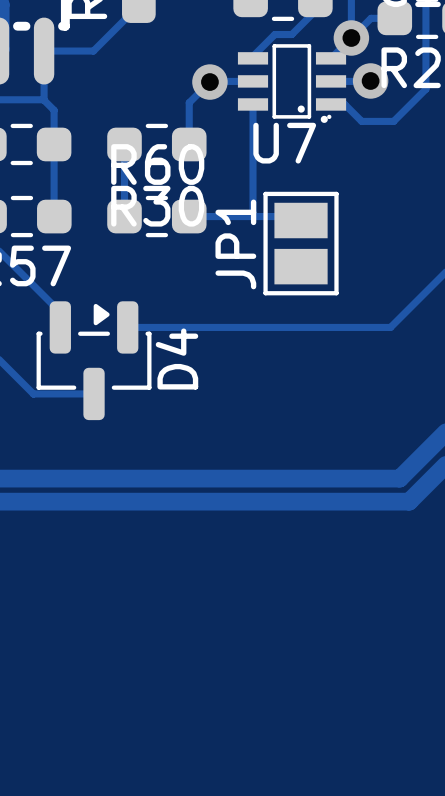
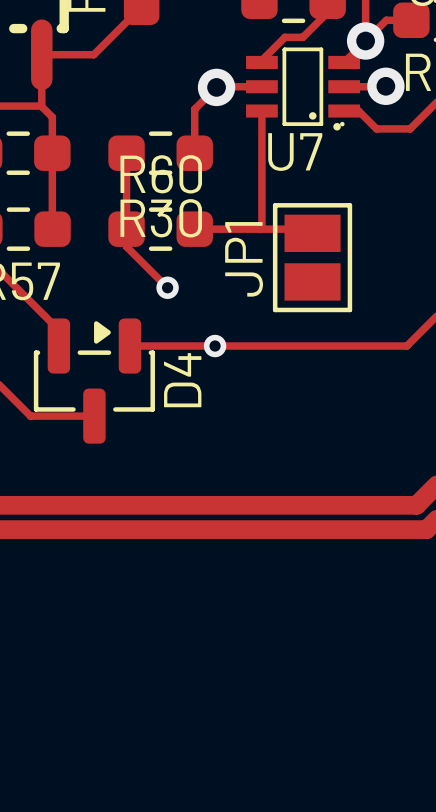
track: none -> (126, 229) (126, 246) (167, 287)
via: none -> (167, 287)
via: none -> (215, 346)

